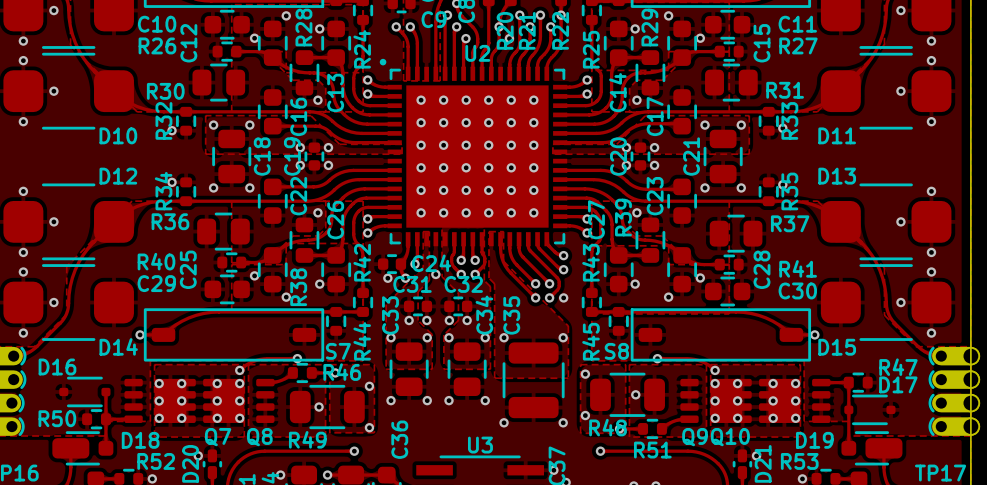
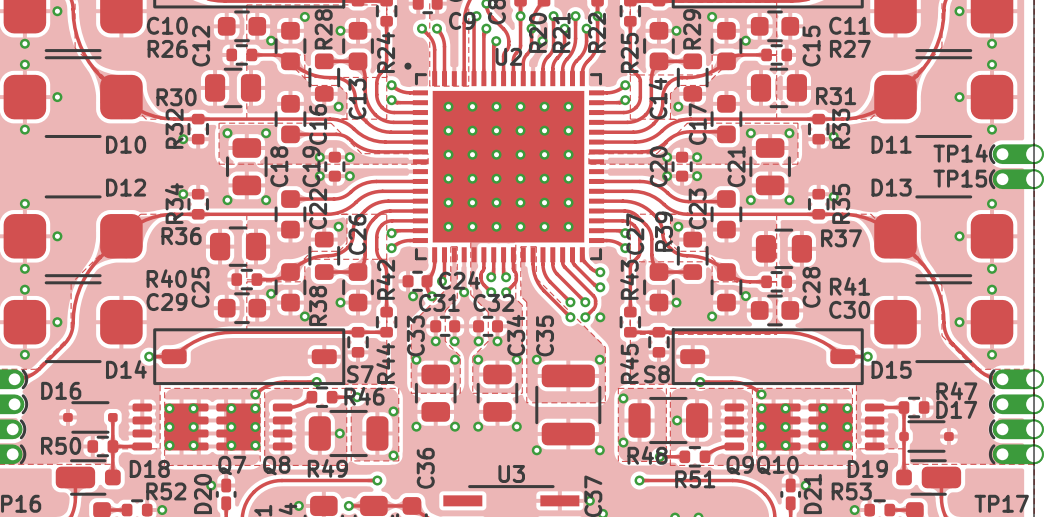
via: none -> (520, 16)
TP14: none -> (1016, 154)
TP15: none -> (1016, 179)

